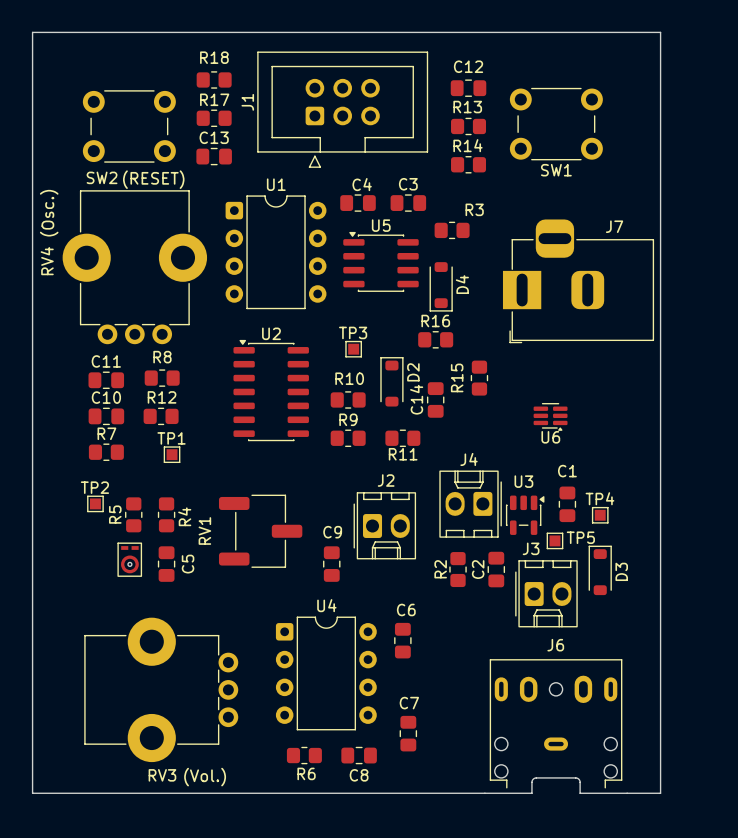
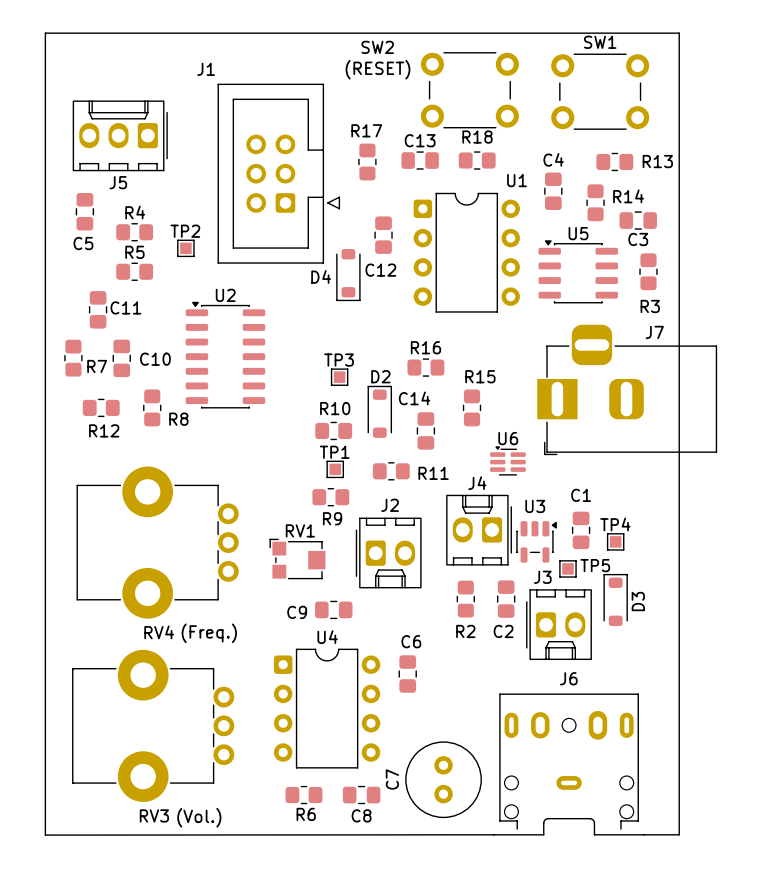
board edge: (58, 32) (32, 32) (32, 793) (484, 793) -> (45, 33) (45, 835) (494, 834)
C12 name position: C12 (468, 66) -> C12 (380, 270)
R18 position: (214, 79) -> (477, 160)
C12 rotation: 0° (468, 88) -> 90° clockwise (383, 235)
C12 position: (468, 88) -> (383, 235)
J1 name position: J1 (247, 102) -> J1 (206, 69)
R13 name position: R13 (467, 107) -> R13 (657, 161)
J1 rotation: 0° (342, 109) -> 90° counterclockwise (278, 173)
R17 rotation: 0° (214, 118) -> 90° clockwise (367, 161)
R17 position: (214, 118) -> (367, 161)
SW1 position: (556, 124) -> (600, 91)
SW2 position: (129, 126) -> (469, 90)
R13 position: (468, 126) -> (614, 161)
J5: none -> (120, 135)
C13 position: (214, 156) -> (420, 160)
R14 rotation: 0° (468, 164) -> 90° clockwise (595, 202)
R14 position: (468, 164) -> (595, 202)
SW1 name position: SW1 (556, 170) -> SW1 (600, 42)
SW2 name position: SW2 (102, 177) -> SW2 (377, 47)
text position: (RESET) (153, 179) -> (RESET) (377, 69)
U1 name position: U1 (276, 184) -> U1 (517, 180)
C3 name position: C3 (408, 184) -> C3 (638, 239)
C4 rotation: 0° (358, 203) -> 90° clockwise (553, 191)
C4 position: (358, 203) -> (553, 191)
C3 position: (408, 203) -> (638, 220)
text: (Osc.) (49, 213) -> none
J7 footprint: [502, 219, 655, 344] -> [537, 324, 718, 456]
R3 rotation: 0° (452, 230) -> 90° clockwise (648, 271)
R3 position: (452, 230) -> (648, 271)
U1 position: (276, 252) -> (466, 252)
U5 position: (380, 261) -> (578, 271)
RV4 rotation: 0° (134, 267) -> 90° counterclockwise (157, 542)
RV4 position: (134, 267) -> (157, 542)
D4 name rotation: 0° (462, 284) -> 90° clockwise (321, 276)
D4 name position: D4 (462, 284) -> D4 (321, 276)
D4 position: (441, 286) -> (348, 275)
R16 position: (435, 339) -> (425, 367)
TP3 position: (353, 349) -> (339, 377)
D2 name rotation: 0° (413, 372) -> 90° clockwise (380, 376)
D2 name position: D2 (413, 372) -> D2 (380, 376)
R15 name rotation: 0° (457, 377) -> 90° clockwise (480, 376)
R8 rotation: 0° (162, 378) -> 90° clockwise (152, 407)
R15 position: (479, 378) -> (472, 407)
C11 rotation: 0° (106, 380) -> 90° clockwise (98, 309)
C11 position: (106, 380) -> (98, 309)
D2 position: (391, 381) -> (379, 411)
U2 position: (271, 390) -> (225, 355)
R12 name position: R12 (162, 397) -> R12 (104, 430)
R10 position: (348, 399) -> (333, 430)
C14 name rotation: 0° (416, 399) -> 90° clockwise (414, 398)
C14 position: (435, 399) -> (425, 430)
C10 rotation: 0° (106, 416) -> 90° clockwise (121, 358)
C10 position: (106, 416) -> (121, 358)
R12 position: (161, 416) -> (101, 407)
U6 rotation: 0° (550, 416) -> 180° (507, 460)
U6 position: (550, 416) -> (507, 460)
R9 name position: R9 (348, 419) -> R9 (332, 518)
R9 position: (348, 438) -> (330, 497)
R11 position: (402, 438) -> (391, 471)
R7 rotation: 0° (106, 452) -> 90° clockwise (73, 358)
R7 position: (106, 452) -> (73, 358)
TP1 position: (172, 454) -> (335, 469)
R11 name position: R11 (403, 454) -> R11 (433, 473)
RV1 footprint: [218, 494, 303, 568] -> [269, 538, 326, 580]
TP2 position: (95, 503) -> (185, 248)
R5 rotation: 0° (133, 514) -> 90° clockwise (134, 271)
R5 position: (133, 514) -> (134, 271)
R4 rotation: 0° (166, 514) -> 90° clockwise (134, 232)
R4 position: (166, 514) -> (134, 232)
R4 name position: R4 (184, 516) -> R4 (135, 212)
RV1 name position: RV1 (204, 530) -> RV1 (300, 530)
C9 name position: C9 (332, 532) -> C9 (297, 612)
part: (129, 559) -> none
C5 position: (166, 564) -> (84, 211)
C5 name rotation: 0° (188, 564) -> 90° clockwise (83, 243)
C5 name position: C5 (188, 564) -> C5 (83, 243)
C9 rotation: 0° (331, 564) -> 90° clockwise (333, 609)
R2 name rotation: 0° (440, 569) -> 90° clockwise (465, 631)
R2 name position: R2 (440, 569) -> R2 (465, 631)
C2 name rotation: 0° (478, 569) -> 90° clockwise (503, 631)
C2 name position: C2 (478, 569) -> C2 (503, 631)
text: none -> (Freq.) (209, 633)
C7 name position: C7 (409, 703) -> C7 (392, 779)
C7 footprint: [399, 715, 418, 752] -> [405, 741, 482, 819]

